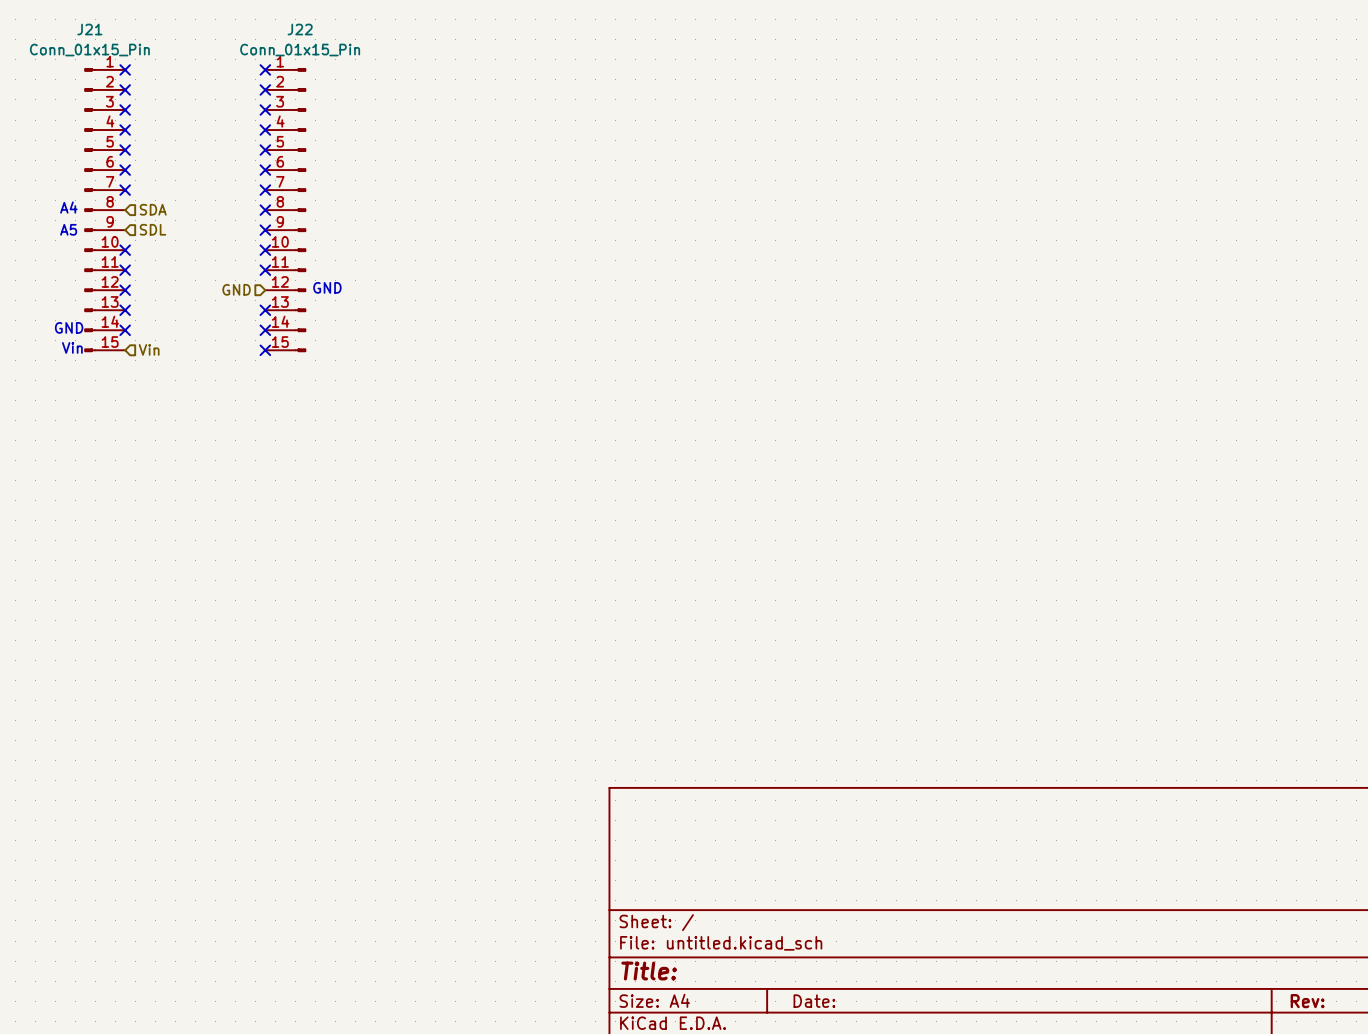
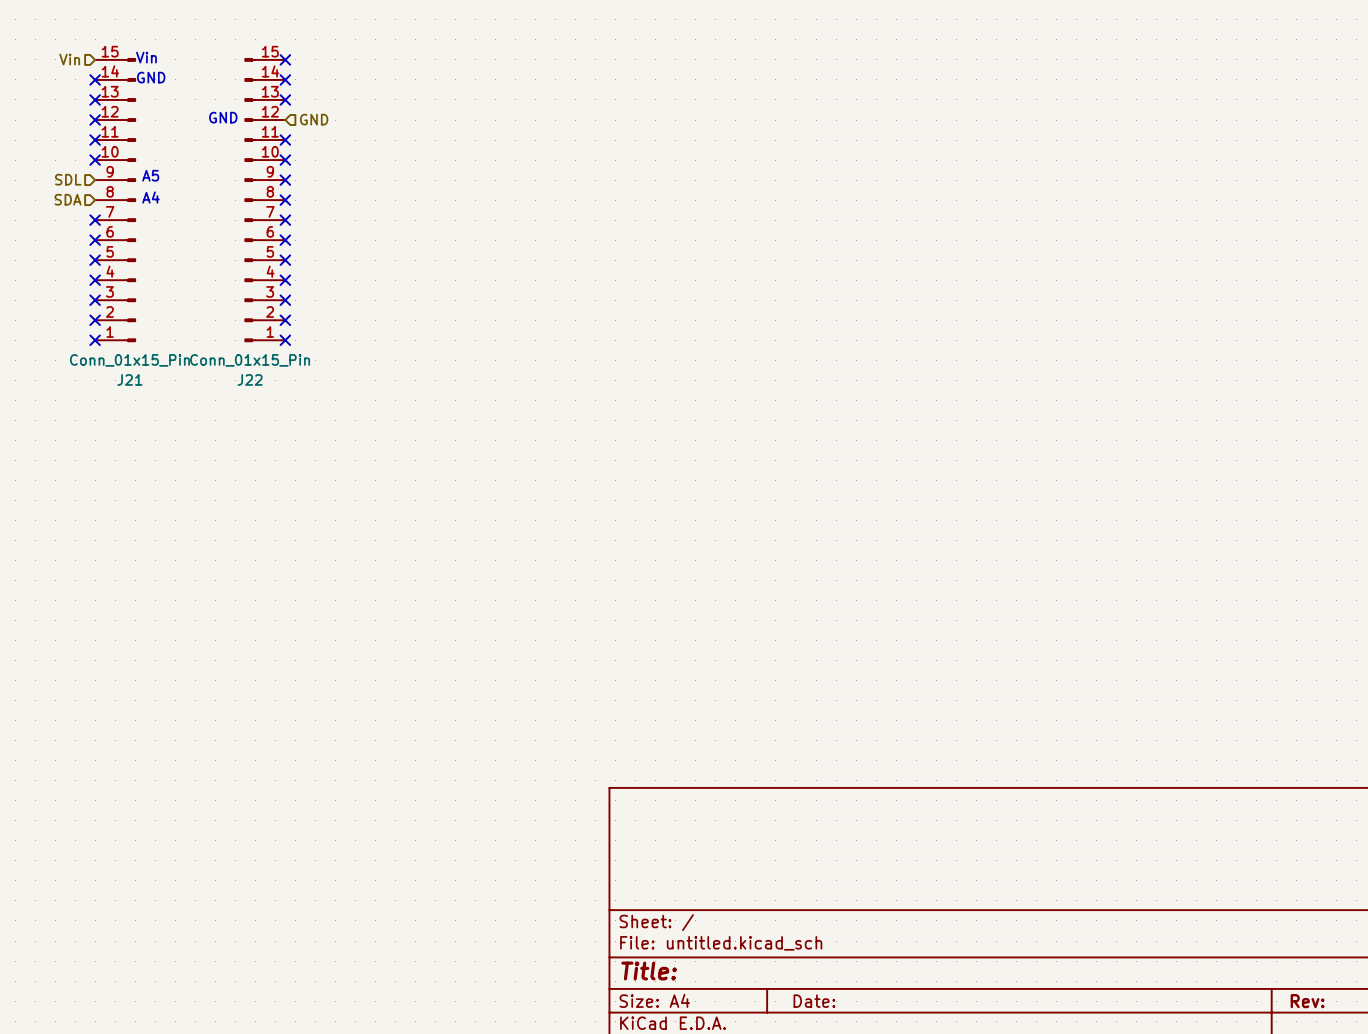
text: none -> Vin (146, 57)
hierarchical label: none -> Vin (69, 59)
no-connect mark: none -> (285, 59)
no-connect mark: (125, 69) -> none
no-connect mark: (265, 69) -> none
text: none -> GND (151, 77)
no-connect mark: none -> (95, 79)
no-connect mark: none -> (285, 79)
no-connect mark: (125, 89) -> none
no-connect mark: (265, 89) -> none
no-connect mark: none -> (95, 99)
no-connect mark: none -> (285, 99)
no-connect mark: (125, 109) -> none
no-connect mark: (265, 109) -> none
text: none -> GND (223, 117)
no-connect mark: none -> (95, 120)
no-connect mark: (125, 130) -> none
no-connect mark: (265, 130) -> none
no-connect mark: none -> (95, 140)
no-connect mark: none -> (285, 140)
no-connect mark: (125, 150) -> none
no-connect mark: (265, 150) -> none
no-connect mark: none -> (95, 160)
no-connect mark: none -> (285, 160)
no-connect mark: (125, 170) -> none
no-connect mark: (265, 170) -> none
no-connect mark: none -> (285, 180)
no-connect mark: (125, 190) -> none
no-connect mark: (265, 190) -> none
no-connect mark: none -> (285, 200)
text position: A4 (68, 207) -> A4 (150, 197)
hierarchical label rotation: 0° (153, 209) -> 180° (68, 199)
hierarchical label position: SDA (153, 209) -> SDA (68, 199)
J21 rotation: 0° (90, 210) -> 180° (130, 200)
no-connect mark: (265, 210) -> none
J22 rotation: 0° (300, 210) -> 180° (250, 200)
no-connect mark: none -> (95, 220)
no-connect mark: none -> (285, 220)
text position: A5 (68, 229) -> A5 (150, 175)
hierarchical label rotation: 0° (152, 229) -> 180° (68, 179)
hierarchical label position: SDL (152, 229) -> SDL (68, 179)
no-connect mark: (265, 230) -> none
no-connect mark: none -> (95, 240)
no-connect mark: none -> (285, 240)
no-connect mark: (125, 250) -> none
no-connect mark: (265, 250) -> none
no-connect mark: none -> (95, 260)
no-connect mark: none -> (285, 260)
no-connect mark: (125, 270) -> none
no-connect mark: (265, 270) -> none
no-connect mark: none -> (95, 280)
no-connect mark: none -> (285, 280)
text: GND (327, 287) -> none
hierarchical label rotation: 0° (236, 289) -> 180° (314, 119)
hierarchical label position: GND (236, 289) -> GND (314, 119)
no-connect mark: (125, 290) -> none
no-connect mark: none -> (95, 300)
no-connect mark: none -> (285, 300)
no-connect mark: (125, 310) -> none
no-connect mark: (265, 310) -> none
no-connect mark: none -> (95, 320)
no-connect mark: none -> (285, 320)
text: GND (69, 327) -> none
no-connect mark: (125, 330) -> none
no-connect mark: (265, 330) -> none
no-connect mark: none -> (95, 340)
no-connect mark: none -> (285, 340)
text: Vin (72, 347) -> none
hierarchical label: Vin (149, 349) -> none
no-connect mark: (265, 350) -> none

